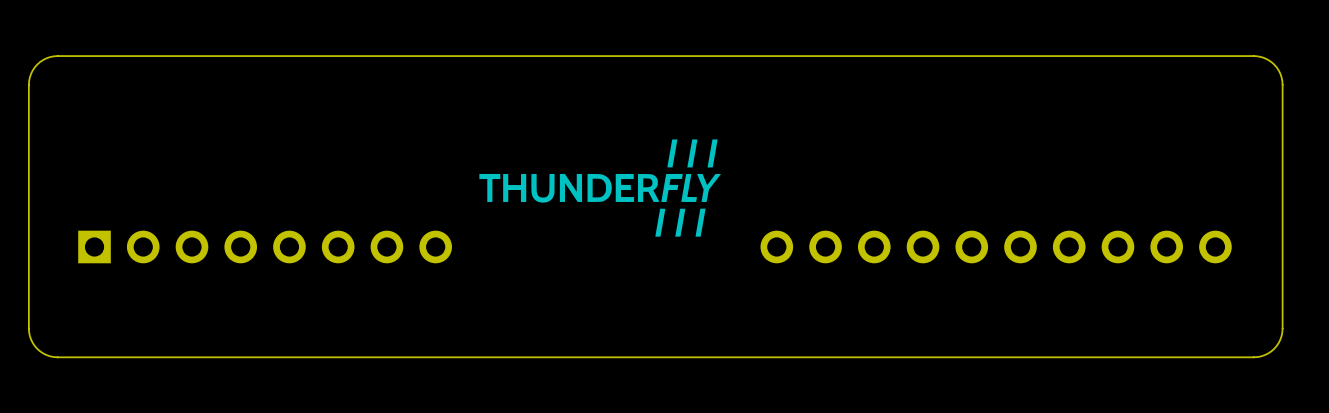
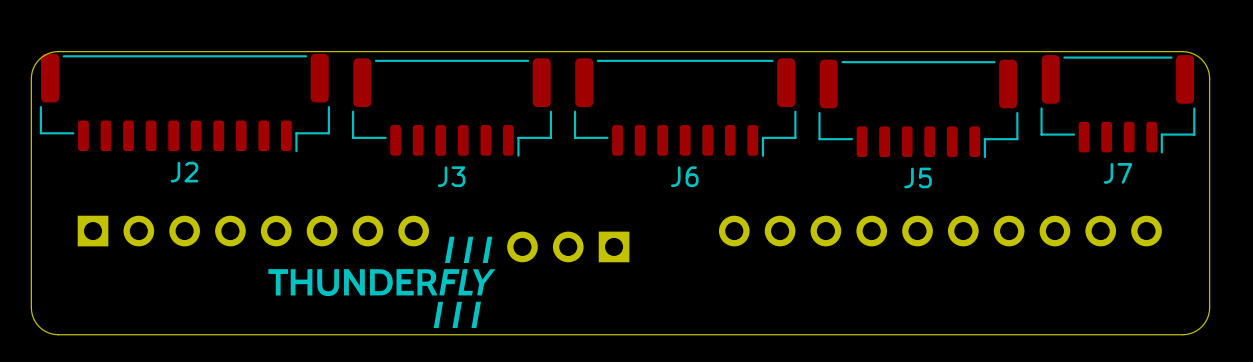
J2: none -> (184, 102)
J7: none -> (1117, 104)
J3: none -> (452, 107)
J6: none -> (685, 107)
J5: none -> (918, 108)
drawing position: (600, 188) -> (381, 282)
part: none -> (568, 246)

